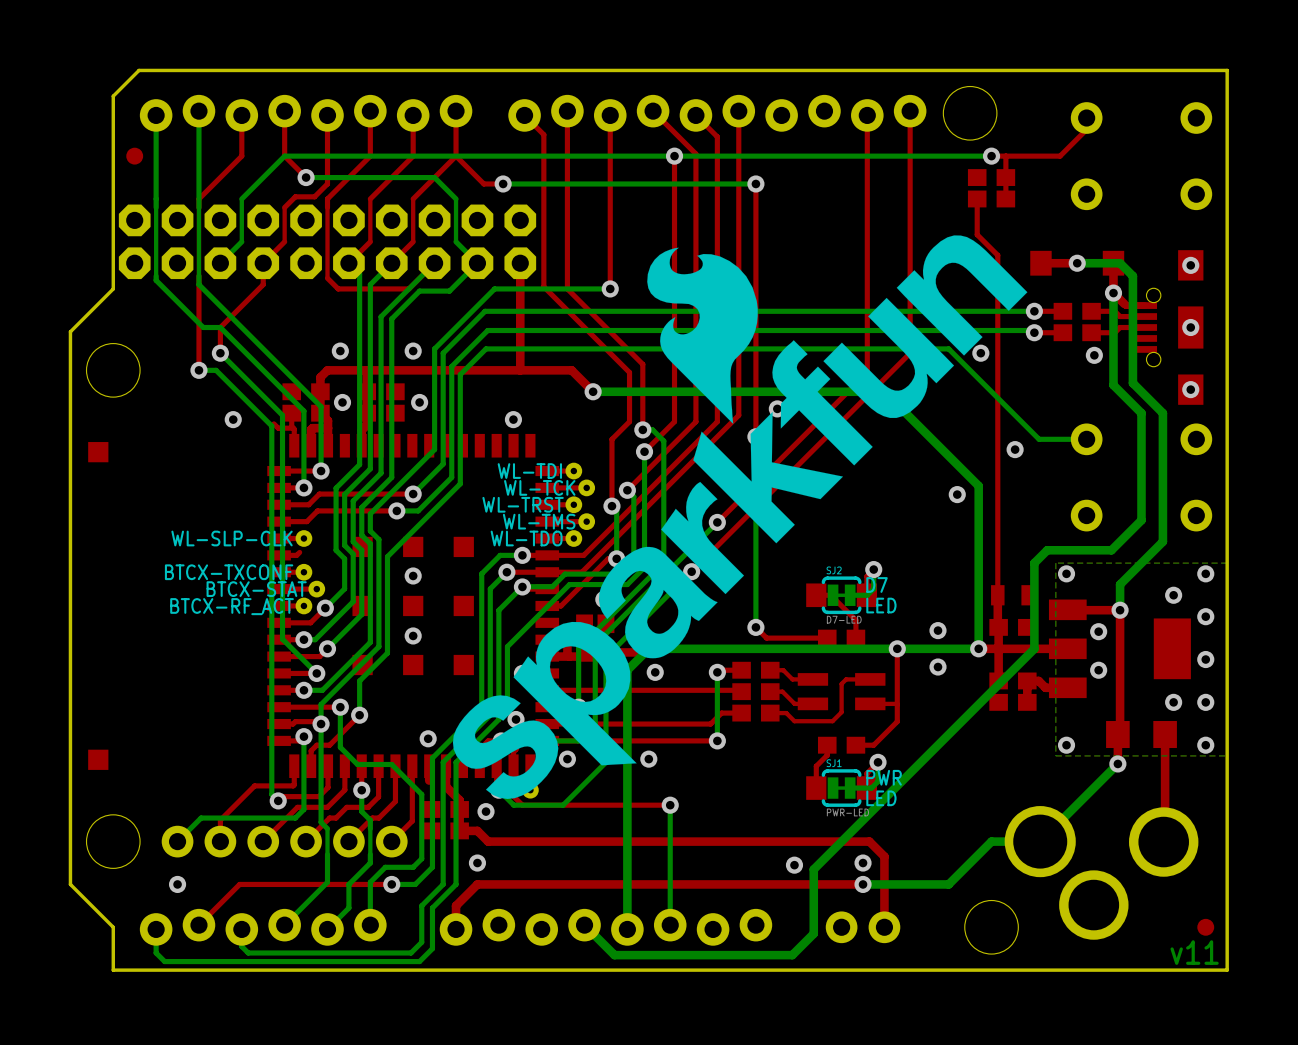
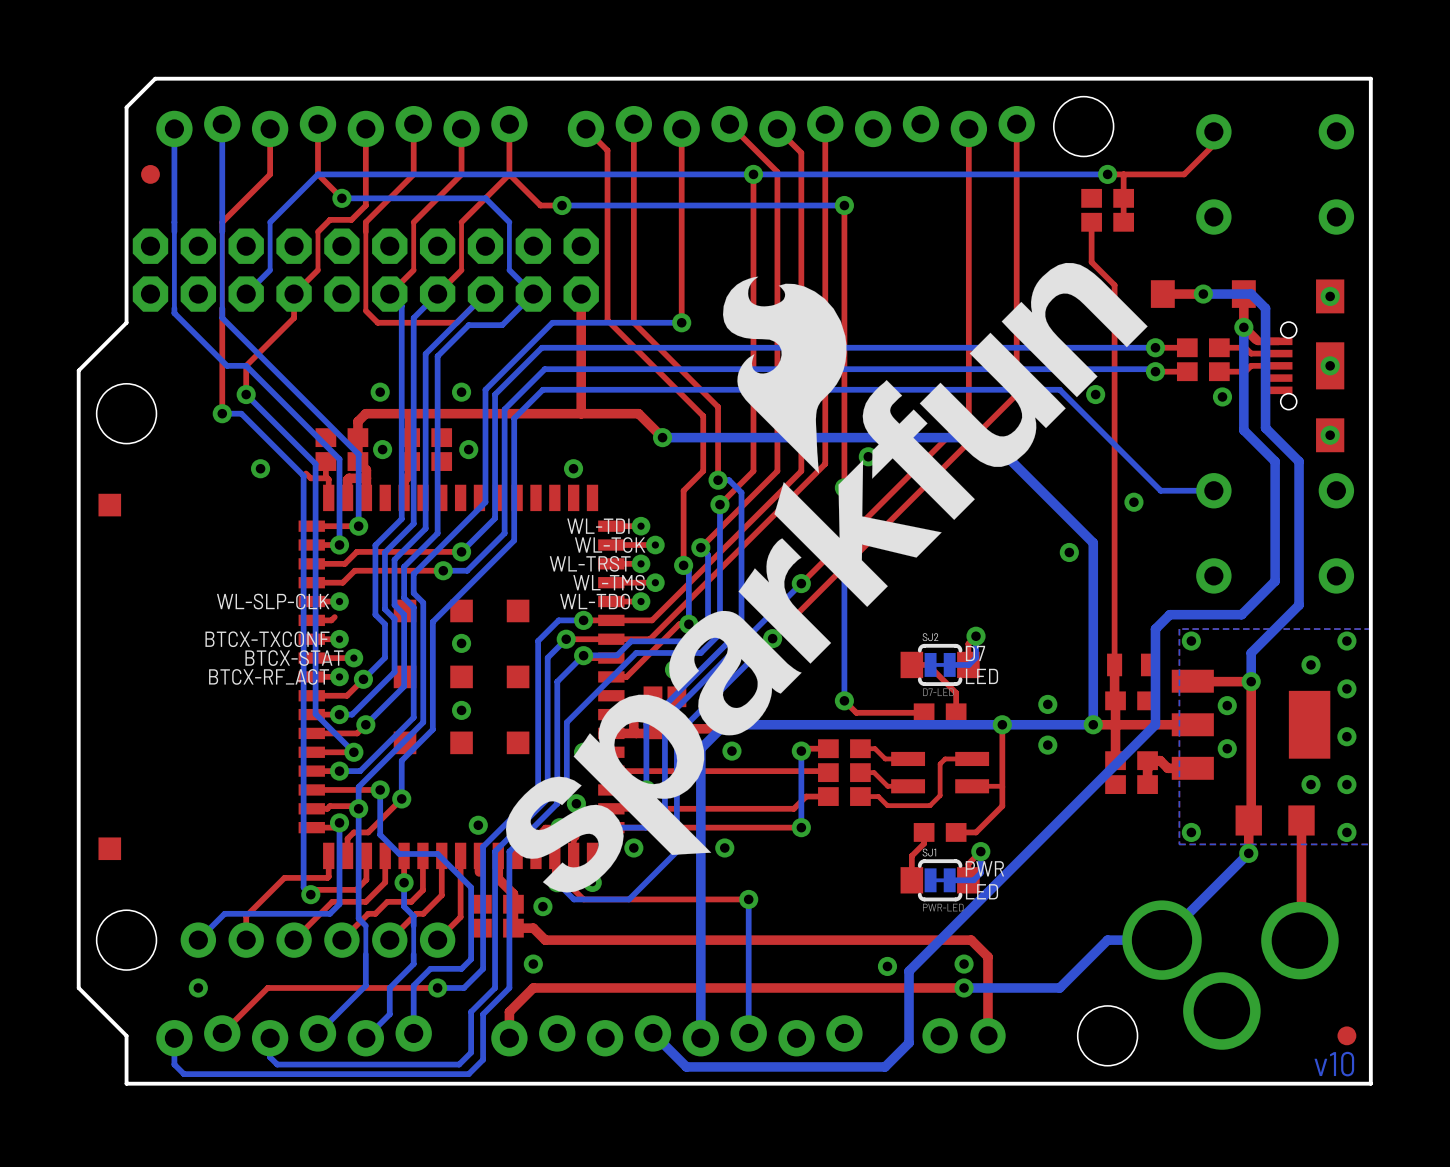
text: v11 (1194, 952) -> v10 (1334, 1064)

